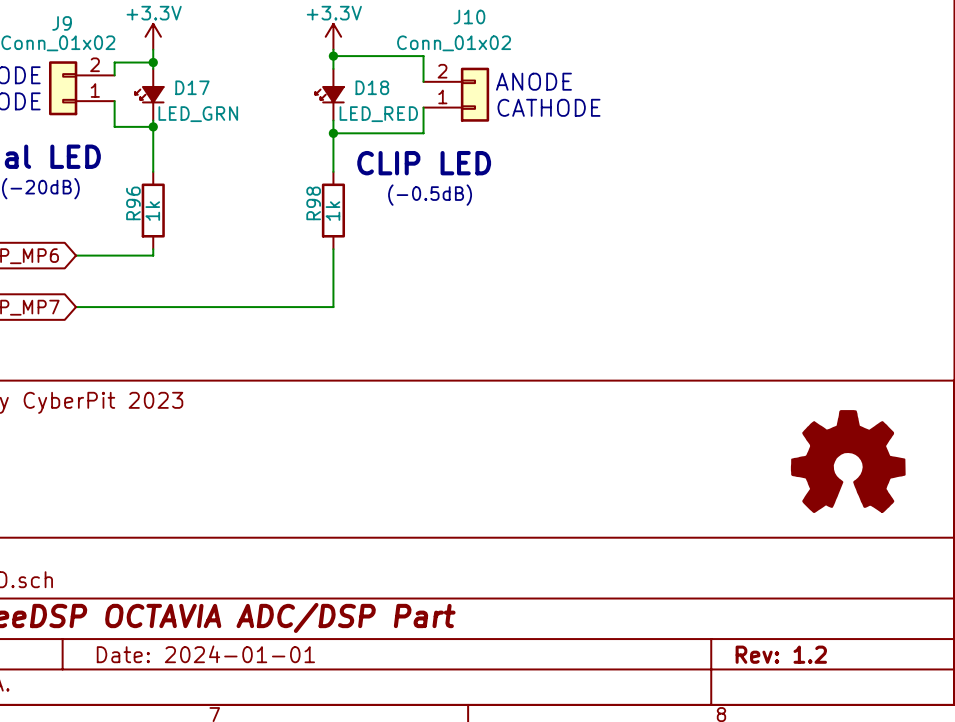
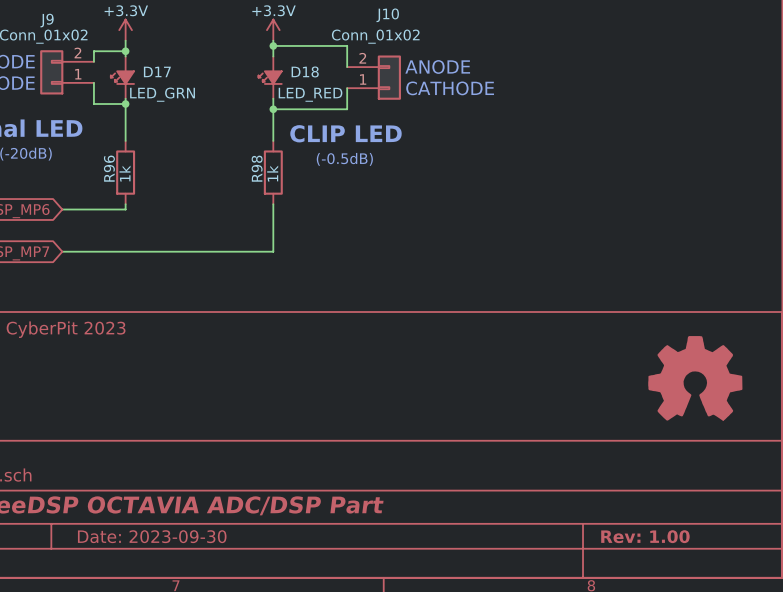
title block: Date: 2024-01-01 (205, 654) -> Date: 2023-09-30 (152, 536)
title block: Rev: 1.2 (781, 654) -> Rev: 1.00 (645, 536)

